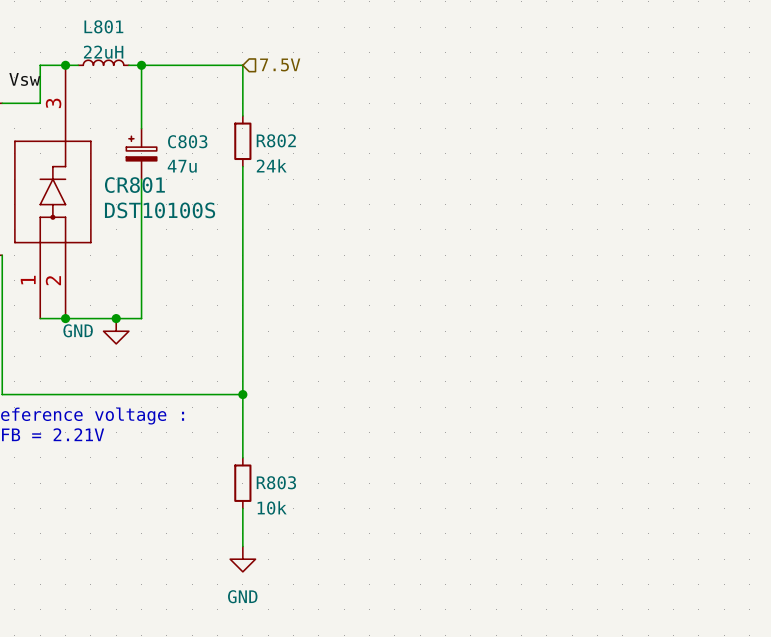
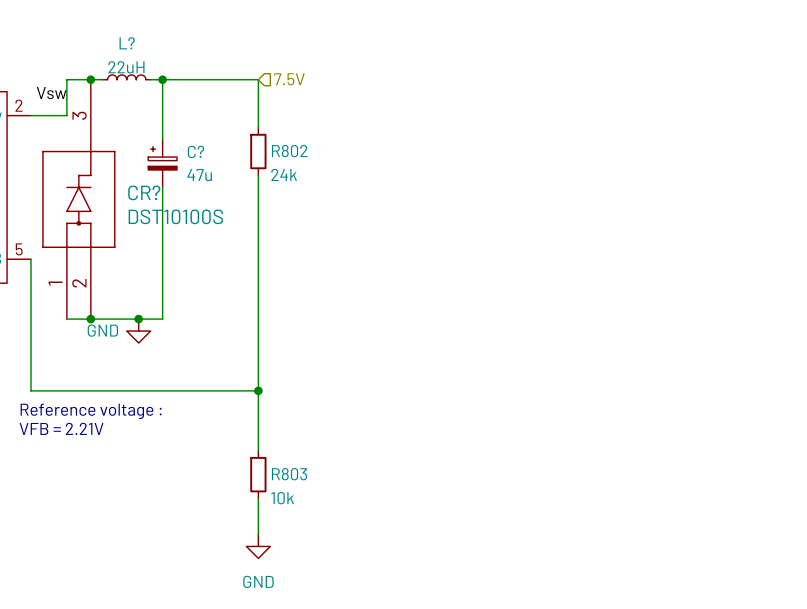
L801 name: L801 (103, 26) -> L? (127, 43)
C803 name: C803 (187, 141) -> C? (195, 151)
CR801 name: CR801 (134, 185) -> CR? (144, 192)

